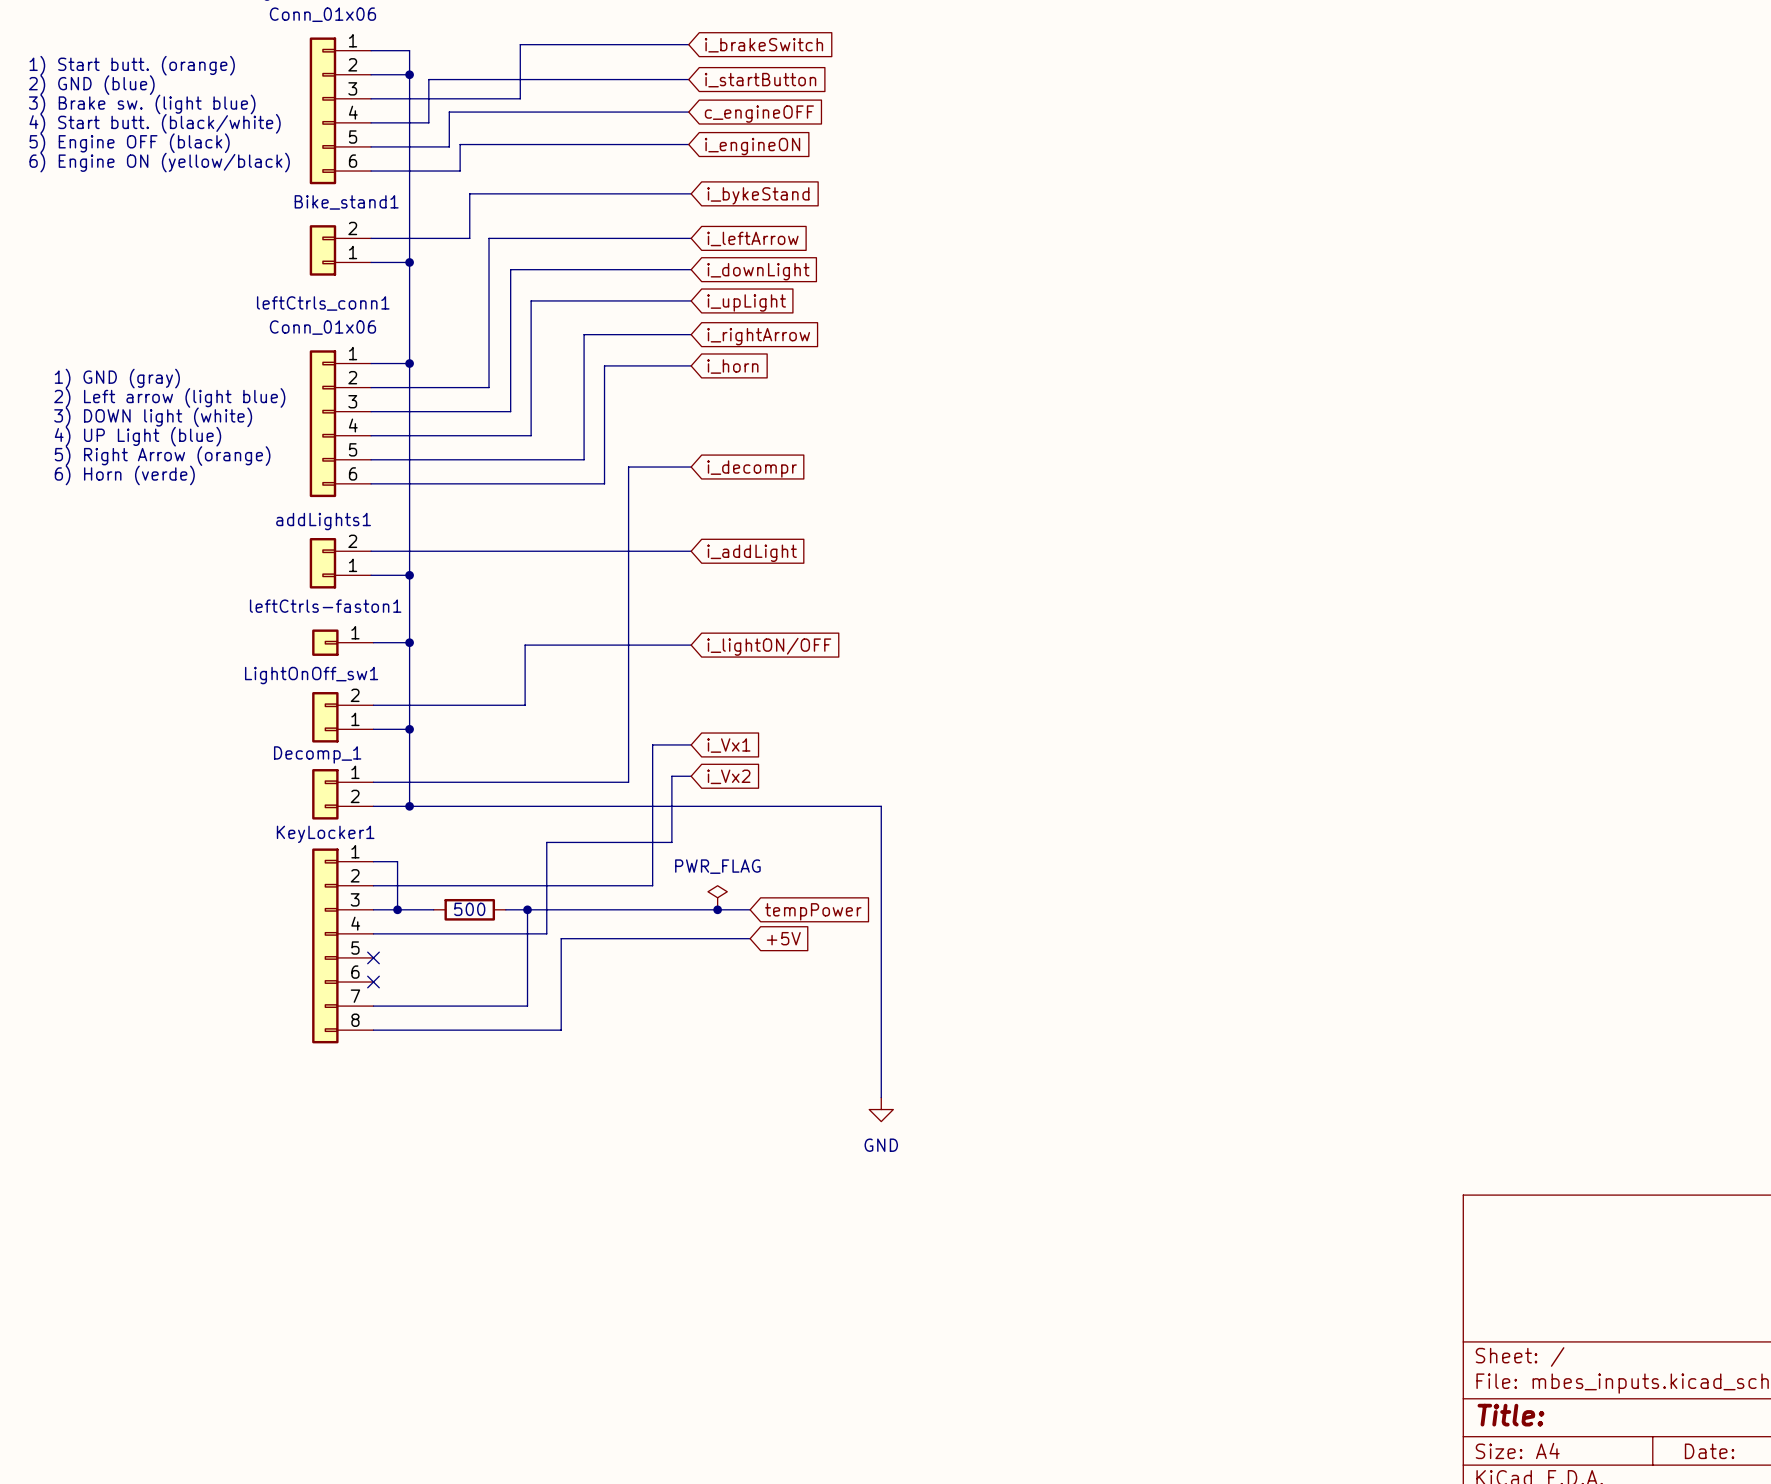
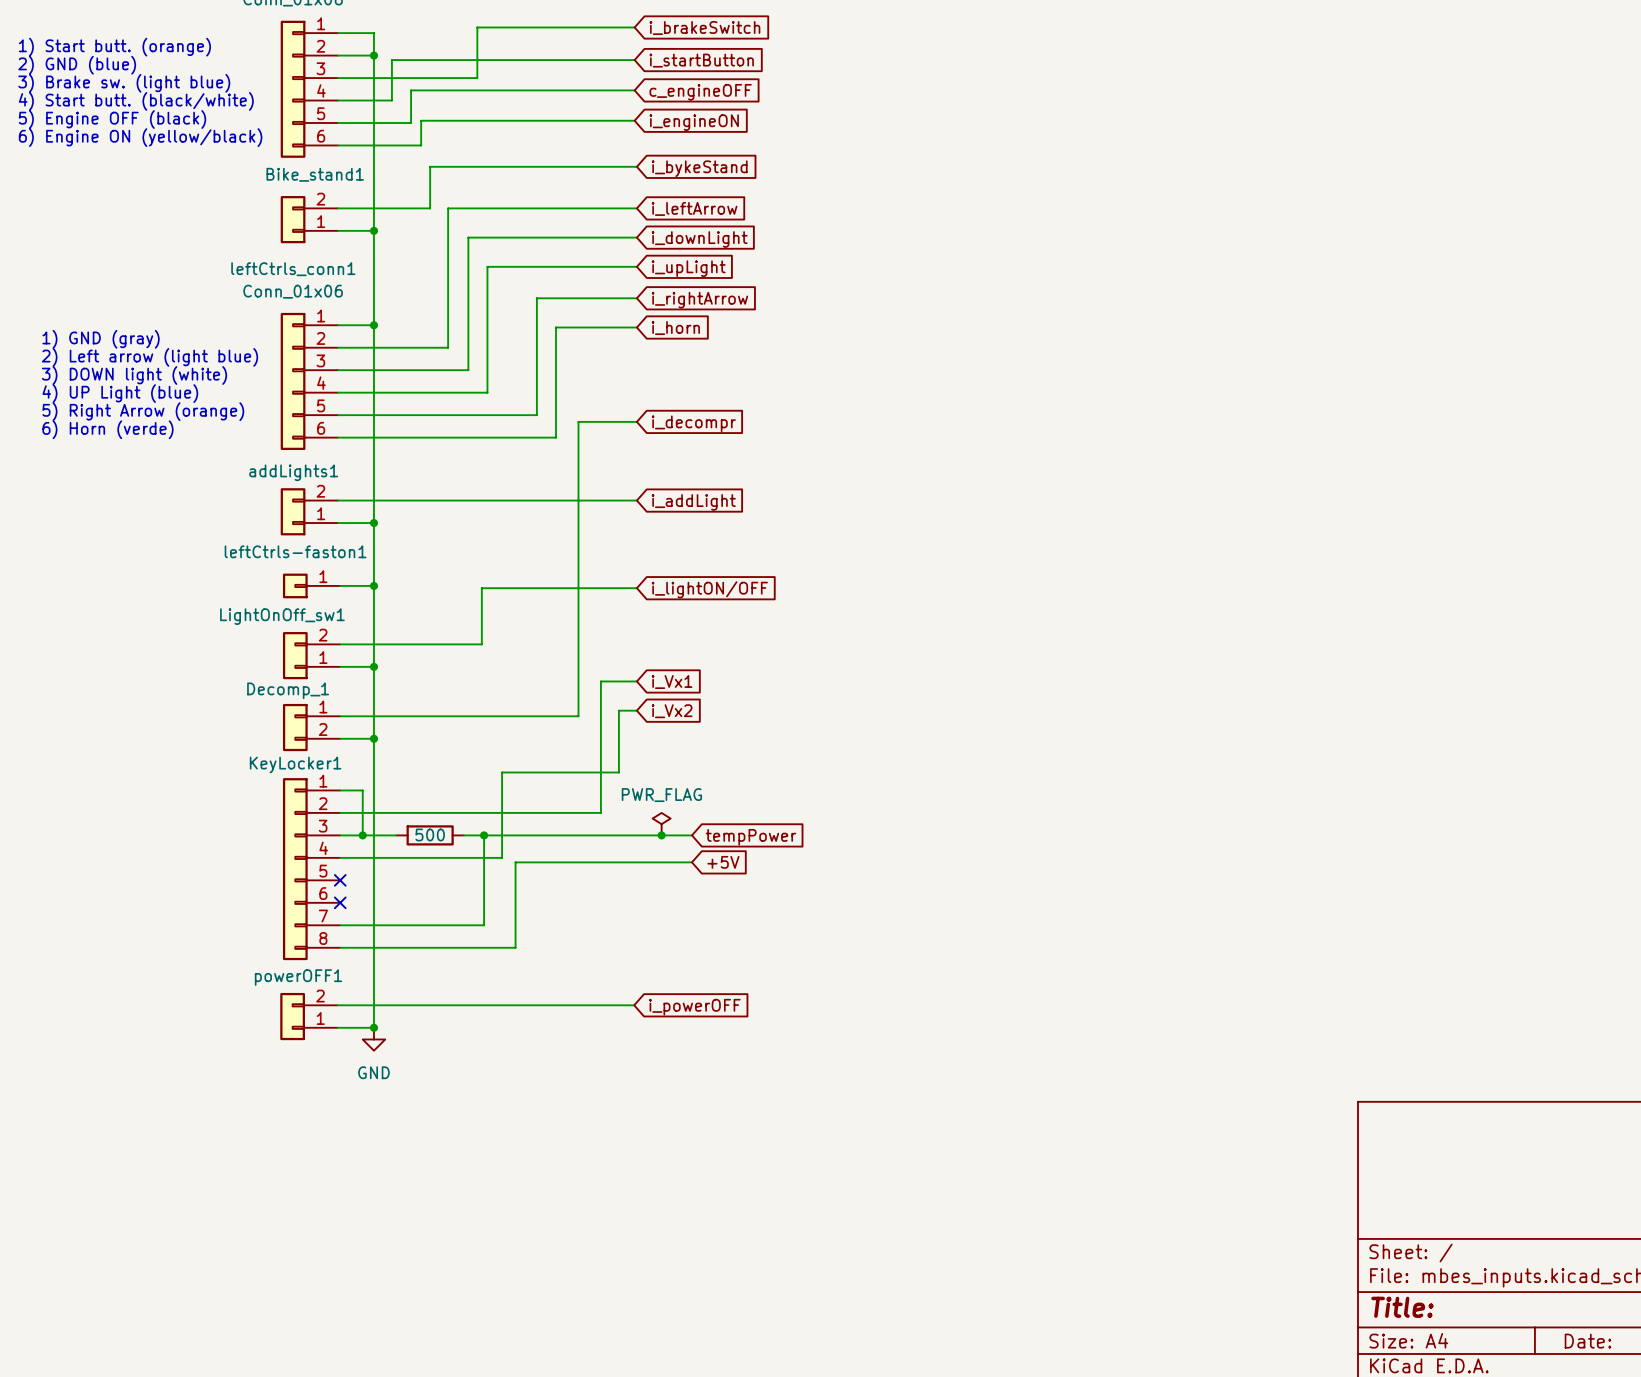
wire: (409, 806) (881, 806) (881, 1097) -> (373, 738) (373, 1028)
wire: none -> (337, 1005) (634, 1005)
global label: none -> i_powerOFF (694, 1007)
powerOFF1: none -> (308, 1016)
power symbol: GND (881, 1109) -> none
wire: none -> (337, 1027) (373, 1027)
junction: none -> (373, 1027)
power symbol: none -> GND (373, 1039)

